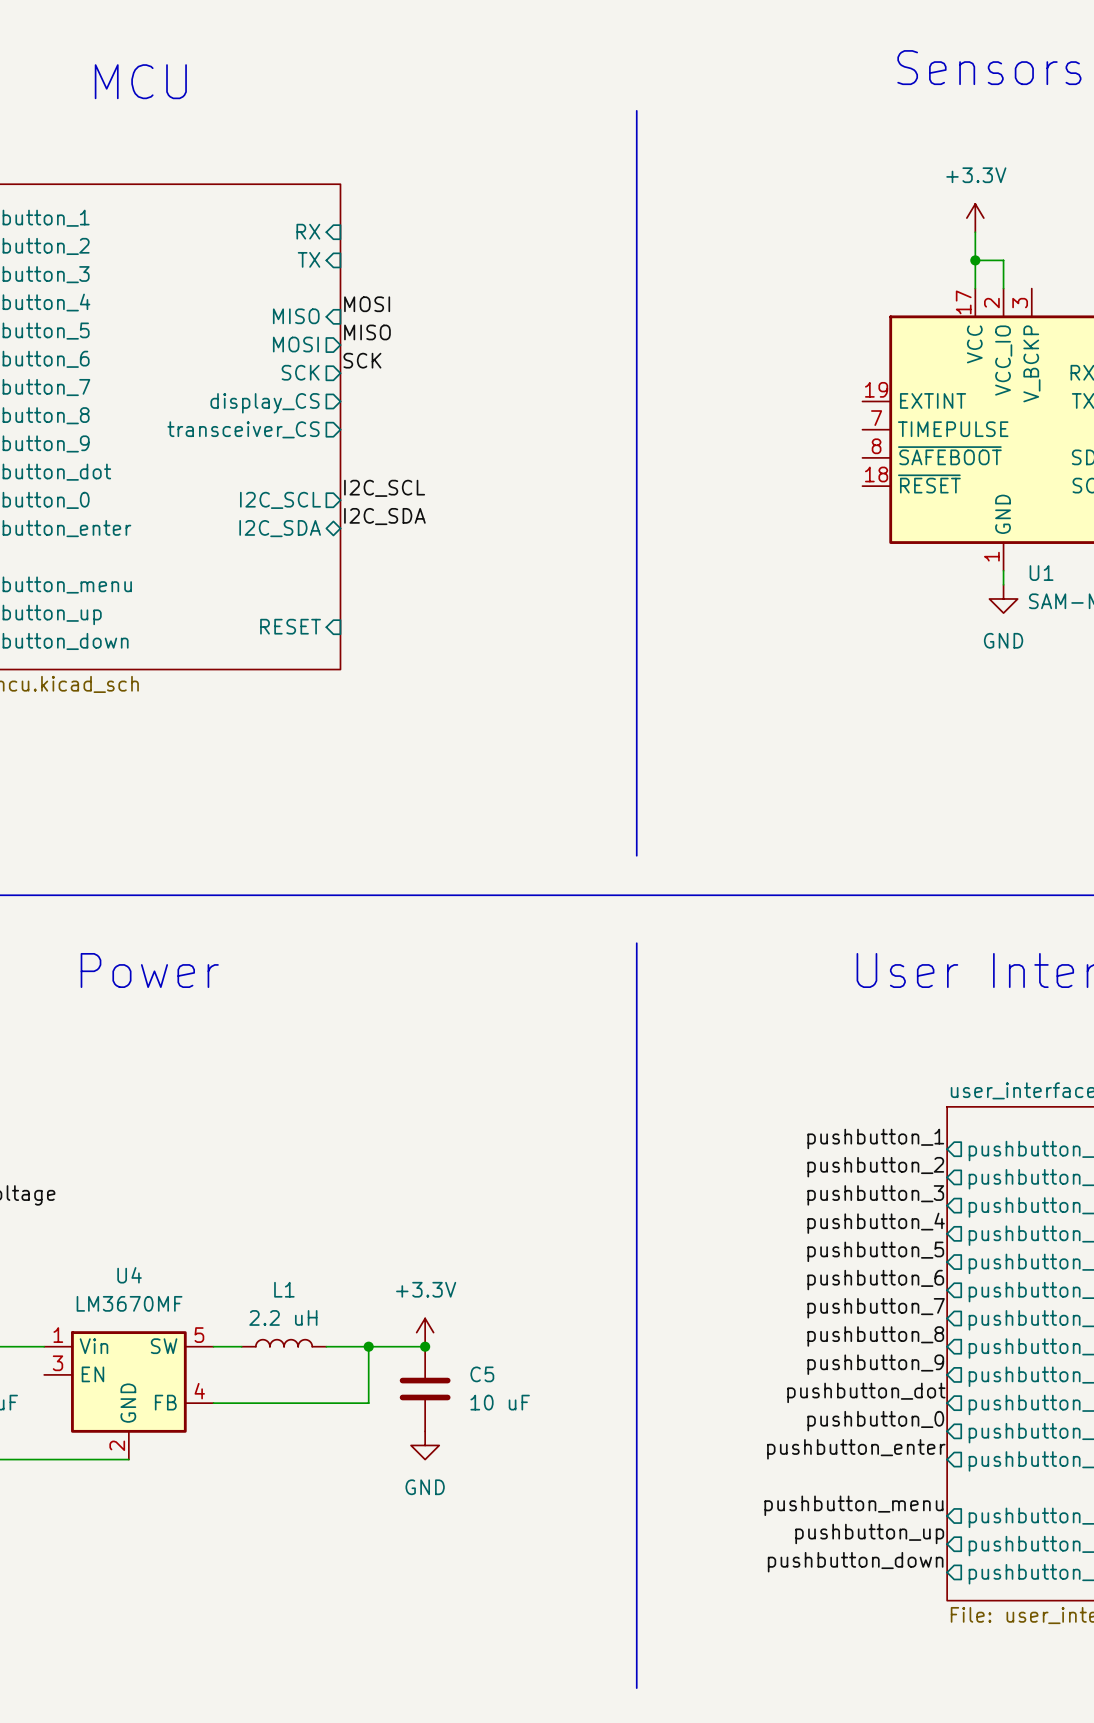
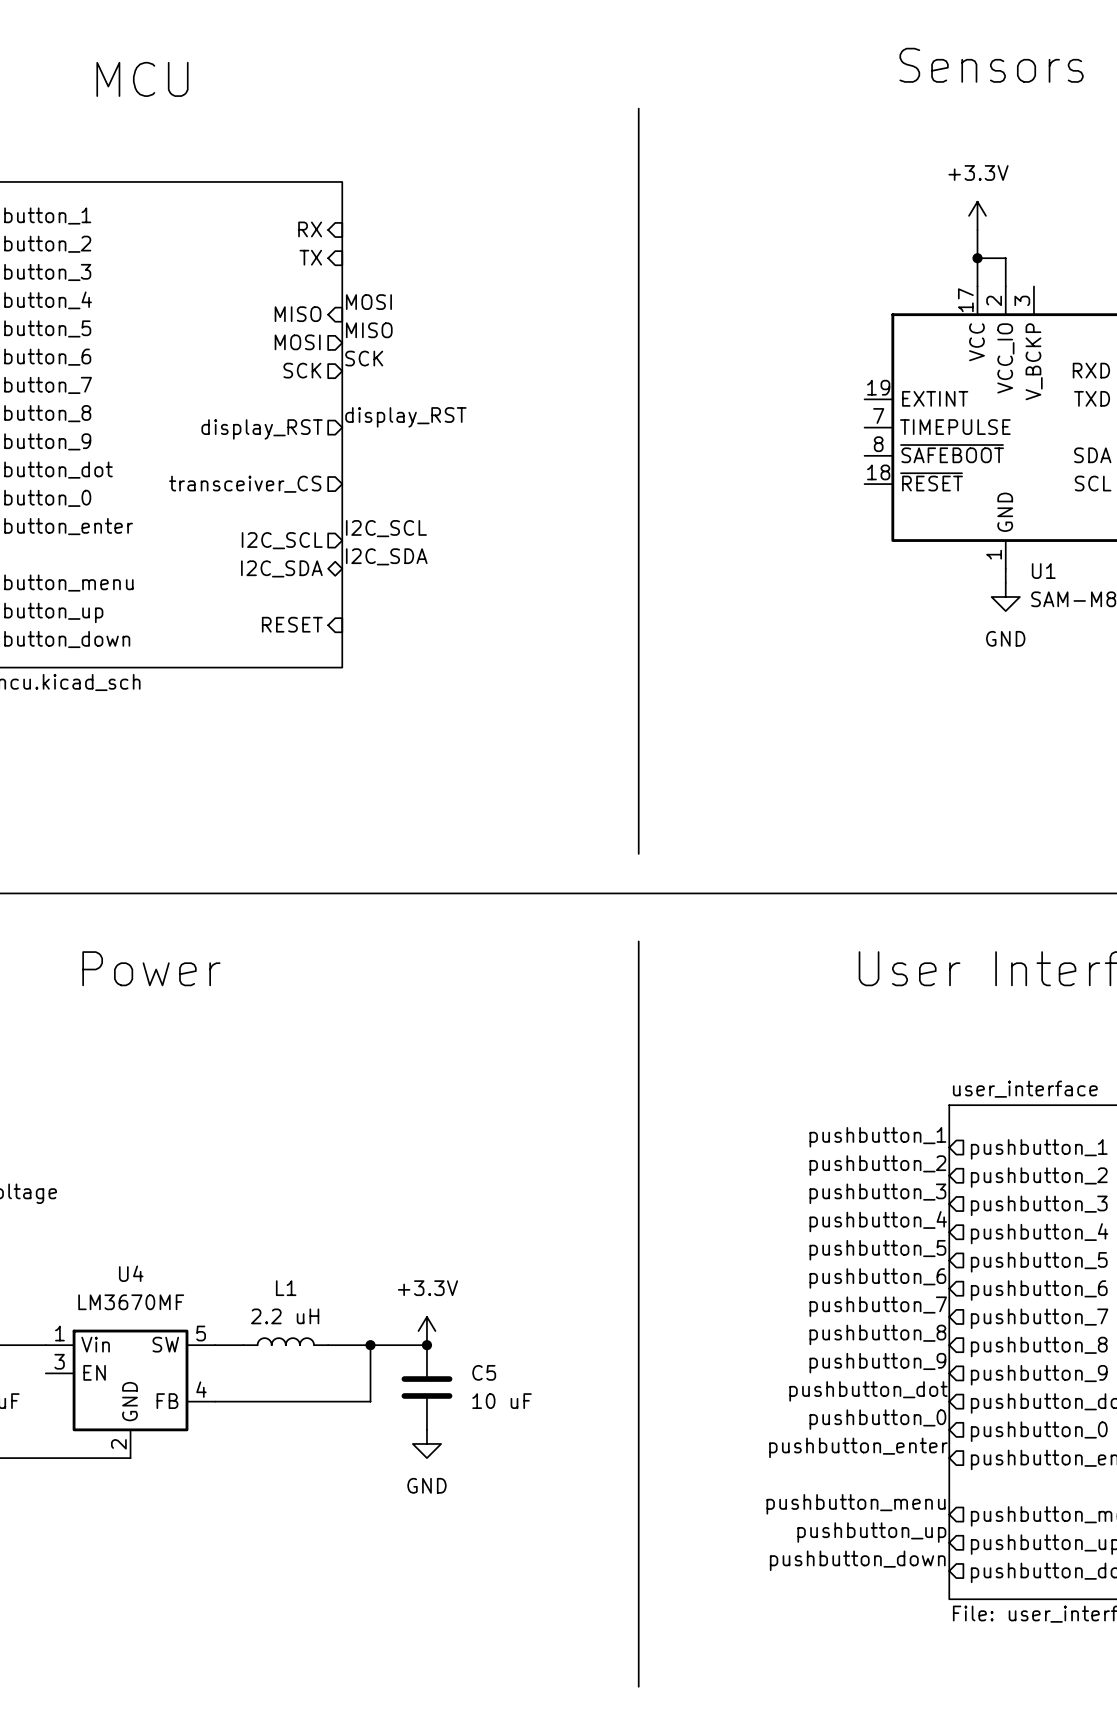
sheet pin: display_CS (265, 403) -> none
label: none -> display_RST (405, 417)
sheet pin: transceiver_CS (243, 429) -> display_RST (262, 429)
sheet pin: none -> transceiver_CS (245, 484)
label position: I2C_SCL (384, 488) -> I2C_SCL (386, 528)
sheet pin position: I2C_SCL (280, 500) -> I2C_SCL (282, 540)
label position: I2C_SDA (384, 516) -> I2C_SDA (386, 556)
sheet pin position: I2C_SDA (280, 528) -> I2C_SDA (281, 568)

